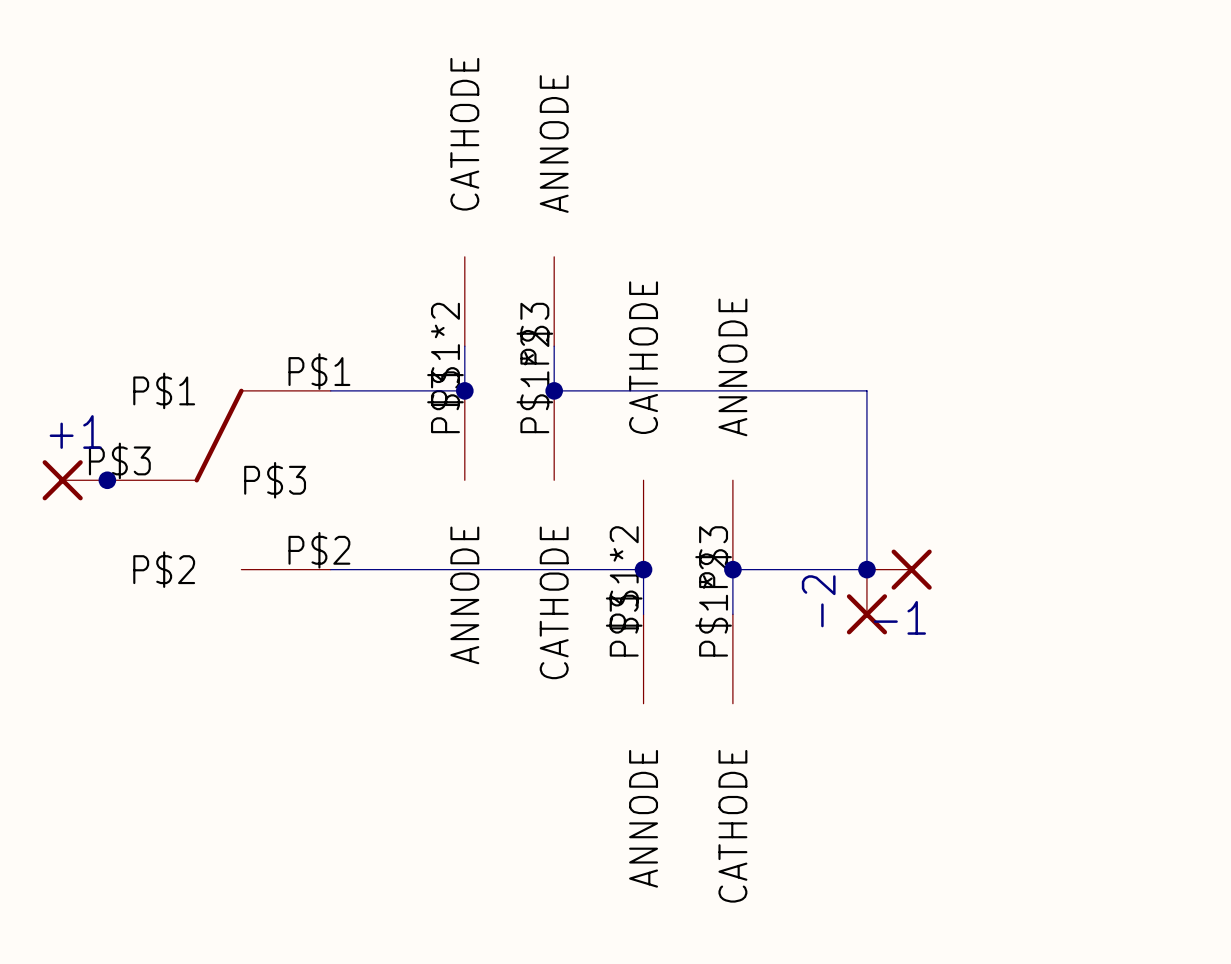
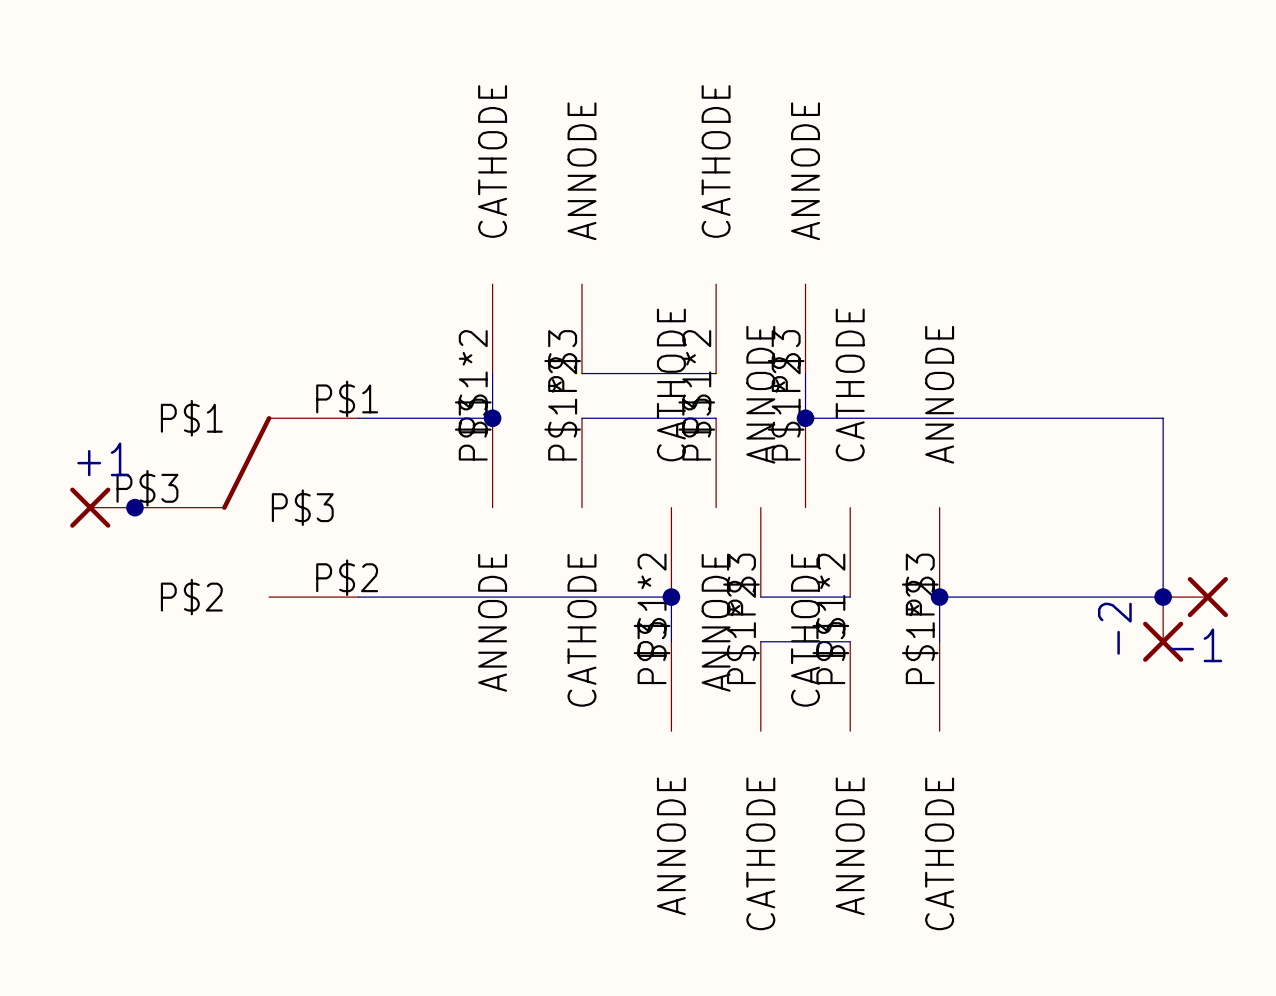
part: none -> (760, 328)
wire: (554, 346) (554, 390) -> (582, 373) (716, 373)
junction: (554, 390) -> none
wire: (688, 390) (777, 390) -> (805, 373) (805, 418)
junction: none -> (805, 418)
wire: (866, 390) (866, 569) (822, 569) -> (894, 418) (1163, 418) (1163, 597) (939, 597) (939, 641)
part: none -> (760, 462)
part: none -> (894, 552)
wire: (732, 569) (732, 614) -> (850, 641) (760, 641)
junction: (732, 569) -> none
junction position: (866, 569) -> (939, 597)
-1 position: (899, 569) -> (1195, 597)
junction: none -> (1163, 597)
-2 position: (866, 602) -> (1163, 629)
part: none -> (894, 686)

